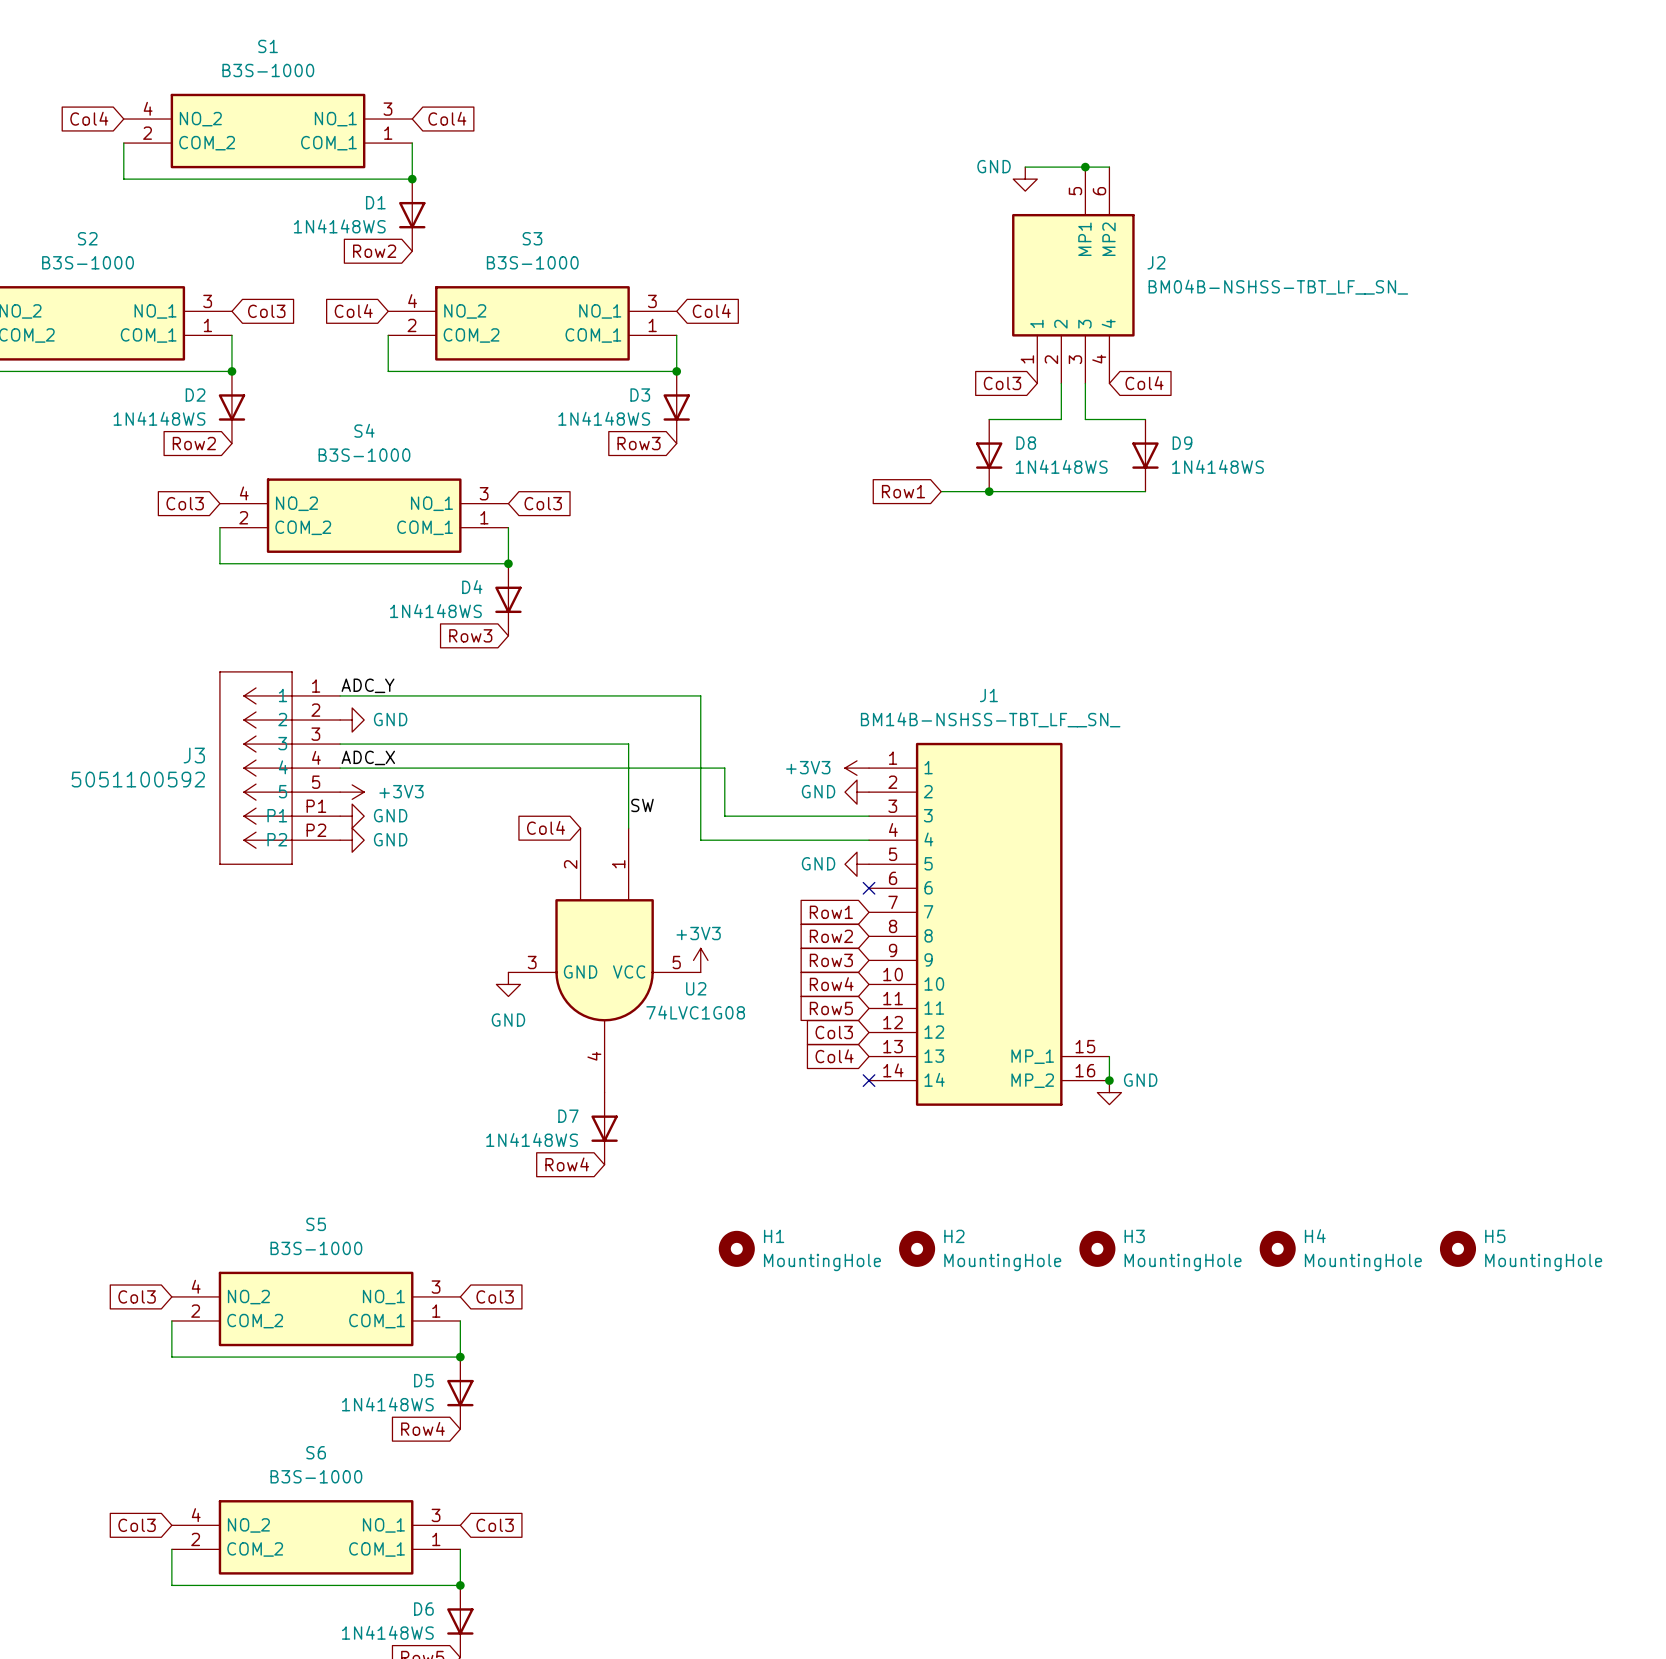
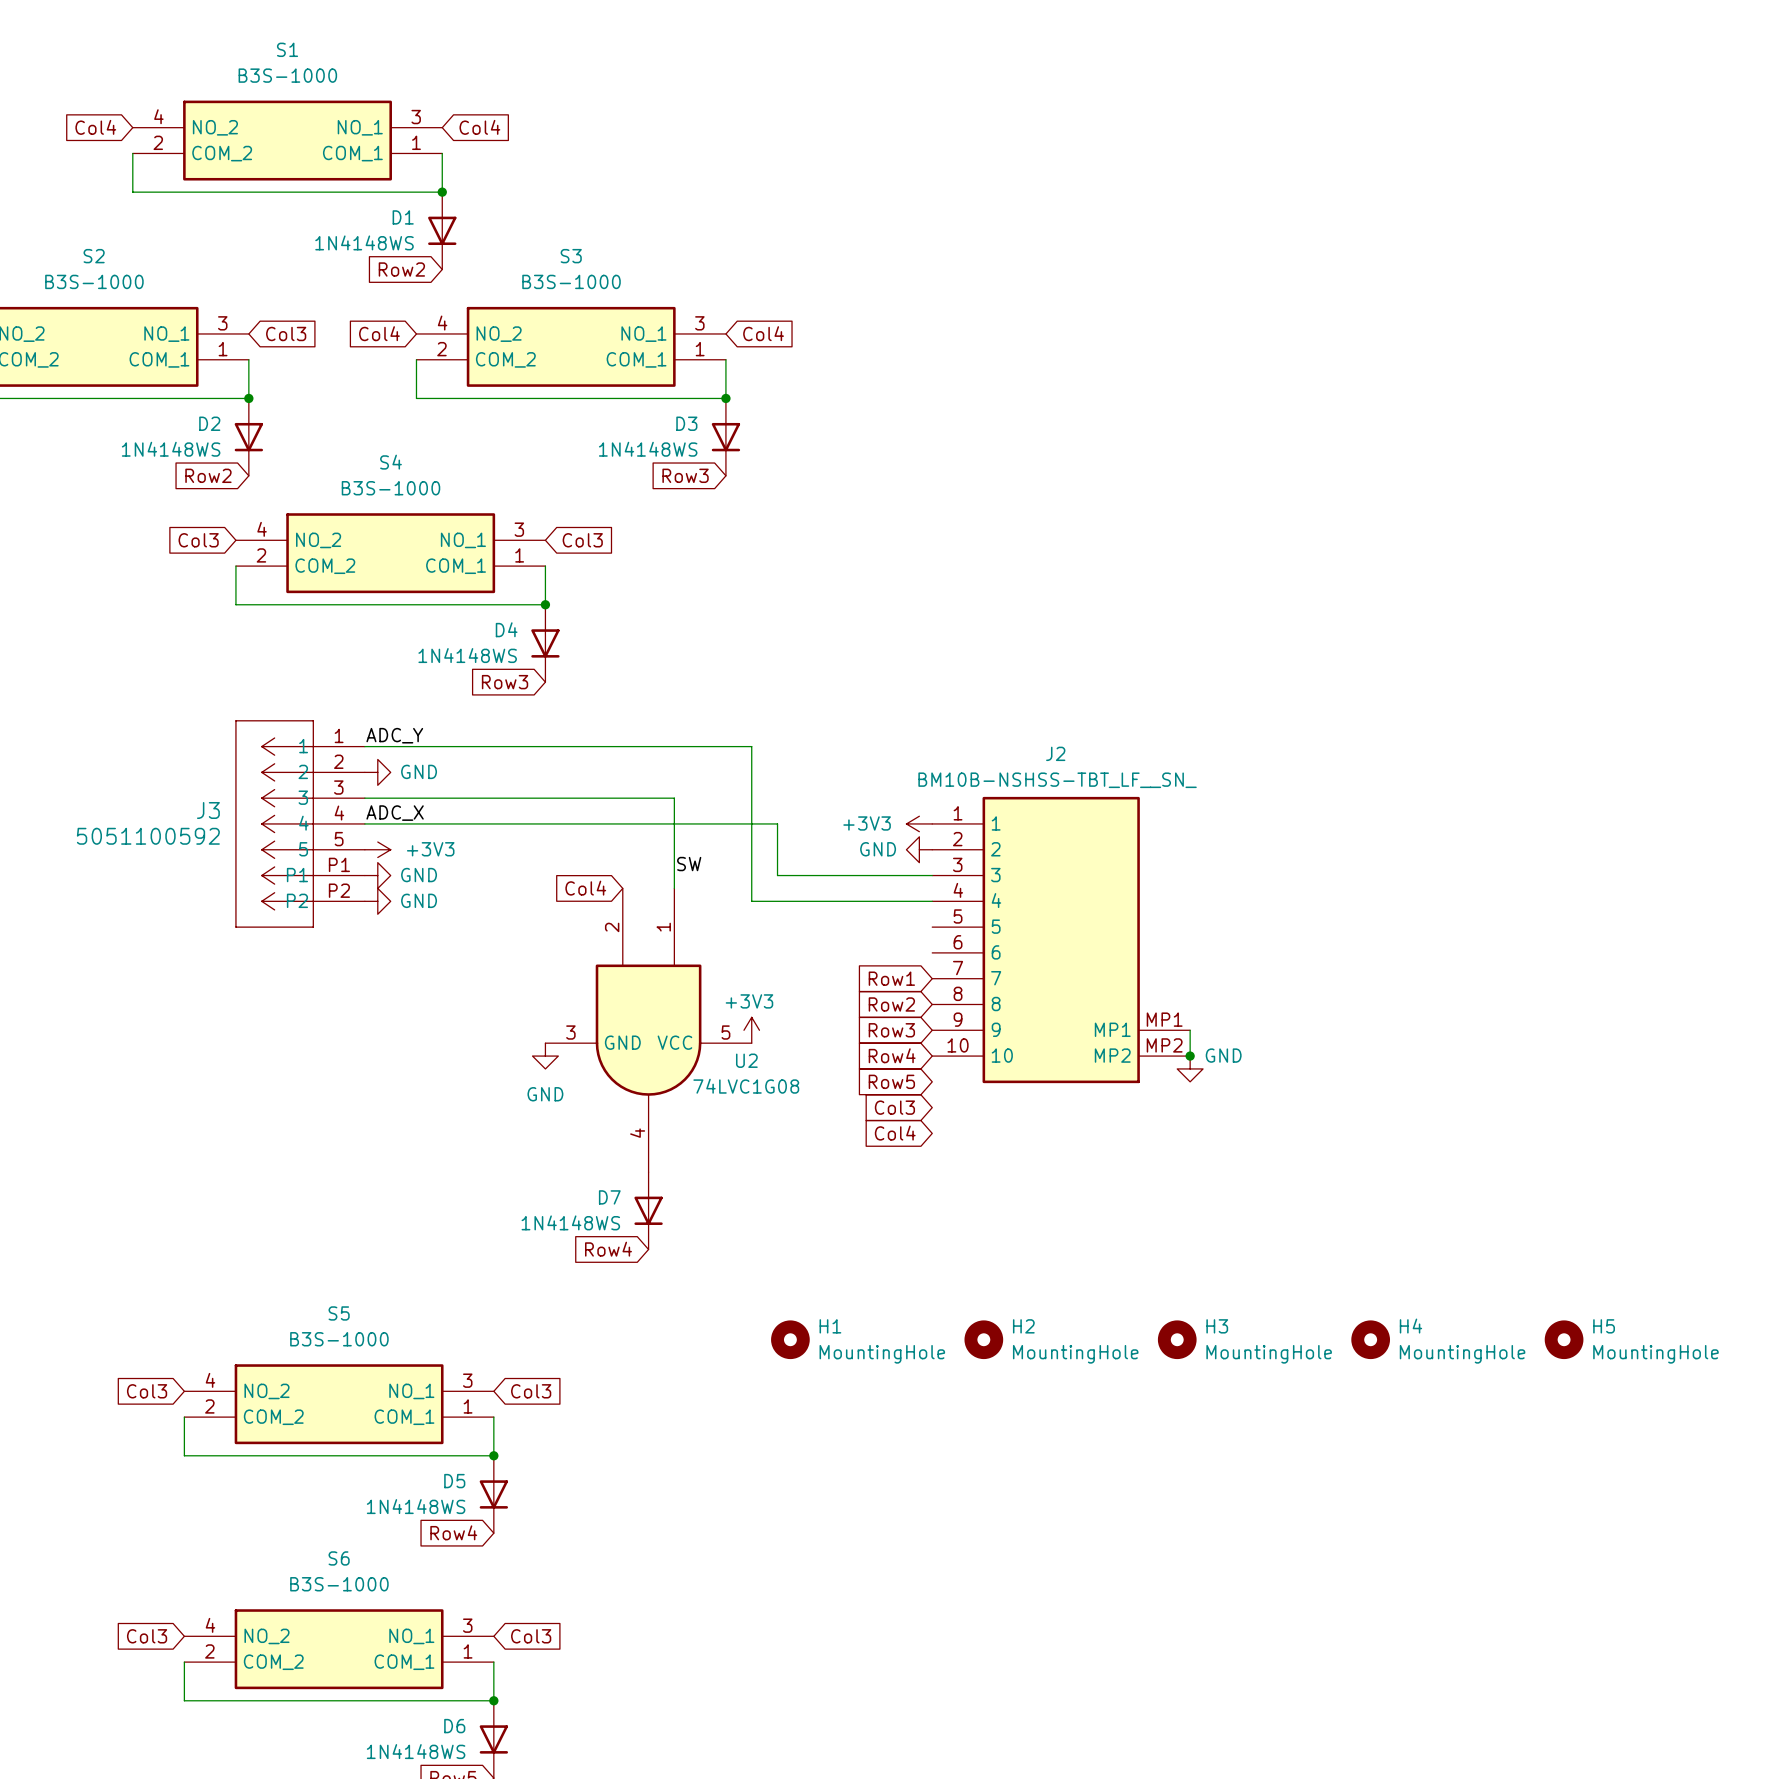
J2 symbol: [1012, 167, 1135, 384] -> [932, 796, 1191, 1084]
wire: (1025, 167) (1109, 167) -> none
junction: (1085, 167) -> none
power symbol: GND (1025, 179) -> none
J2 name position: J2 (1156, 262) -> J2 (1055, 753)
J2 value: BM04B-NSHSS-TBT_LF__SN_ (1278, 287) -> BM10B-NSHSS-TBT_LF__SN_ (1057, 780)
global label: Col3 (1002, 383) -> none
wire: (1061, 383) (1061, 419) (989, 419) -> none
wire: (1085, 383) (1085, 419) (1145, 419) -> none
global label: Col4 (1144, 383) -> none
D8: 1N4148WS (989, 455) -> none
D9: 1N4148WS (1145, 455) -> none
global label: Row1 (903, 491) -> none
wire: (941, 491) (1145, 491) -> none
junction: (989, 491) -> none
power symbol: GND (857, 864) -> none
no-connect mark: (869, 888) -> none
J1: BM14B-NSHSS-TBT_LF__SN_ (989, 924) -> none
junction: none -> (1190, 1056)
wire: (1109, 1056) (1109, 1080) -> (1190, 1030) (1190, 1056)
no-connect mark: (869, 1080) -> none
junction: (1109, 1080) -> none
power symbol position: GND (1109, 1092) -> GND (1190, 1068)

